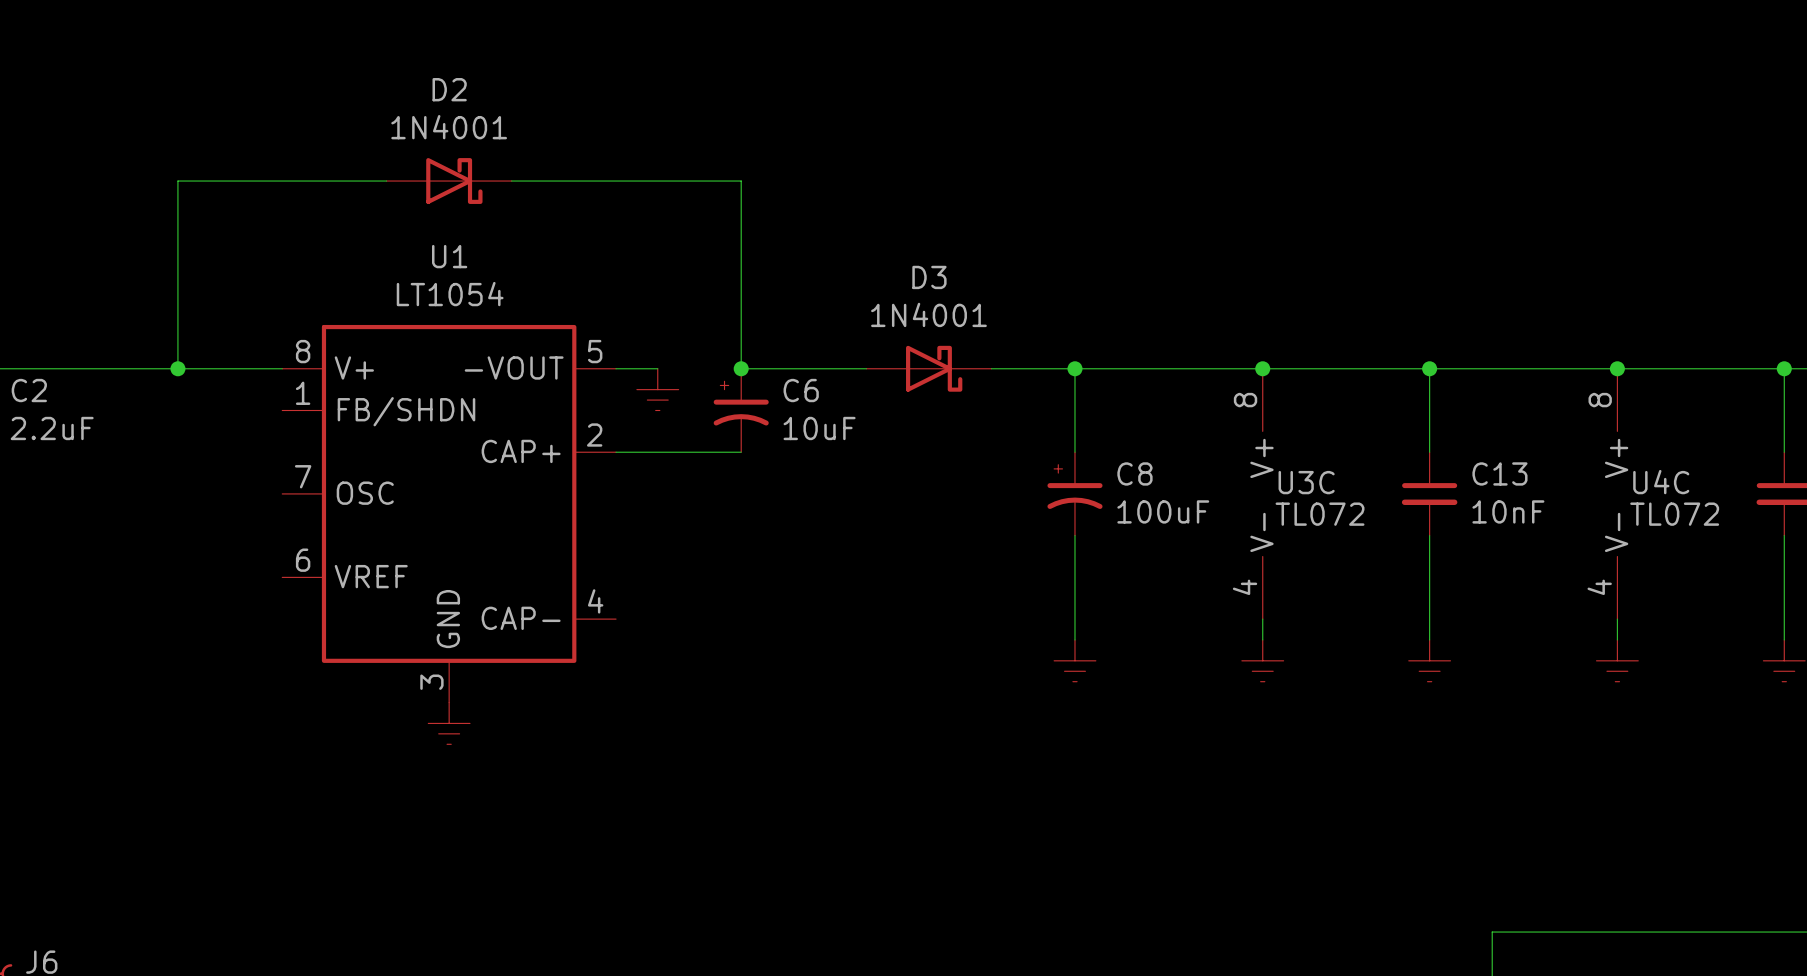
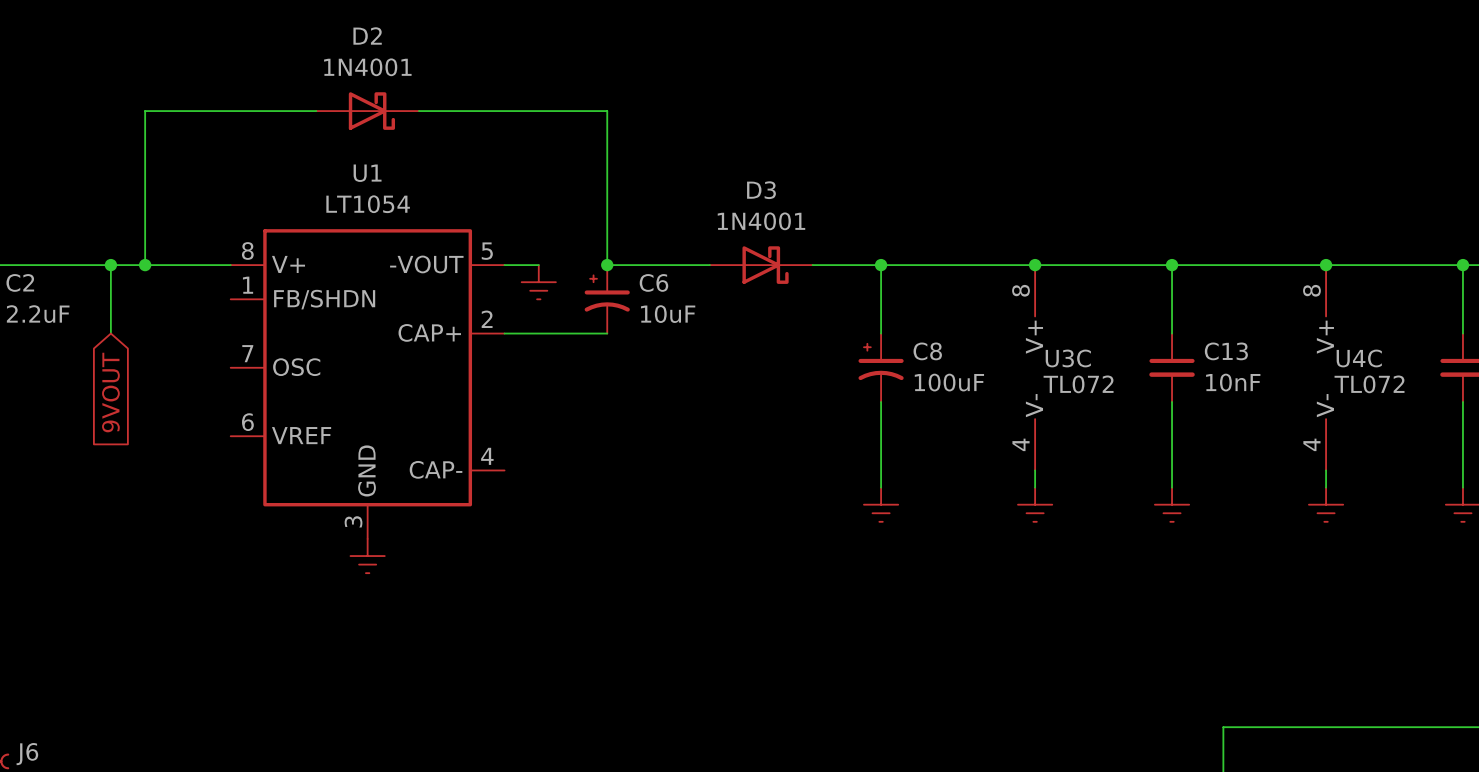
wire: none -> (110, 265) (110, 333)
junction: none -> (110, 265)
global label: none -> 9VOUT (110, 392)

